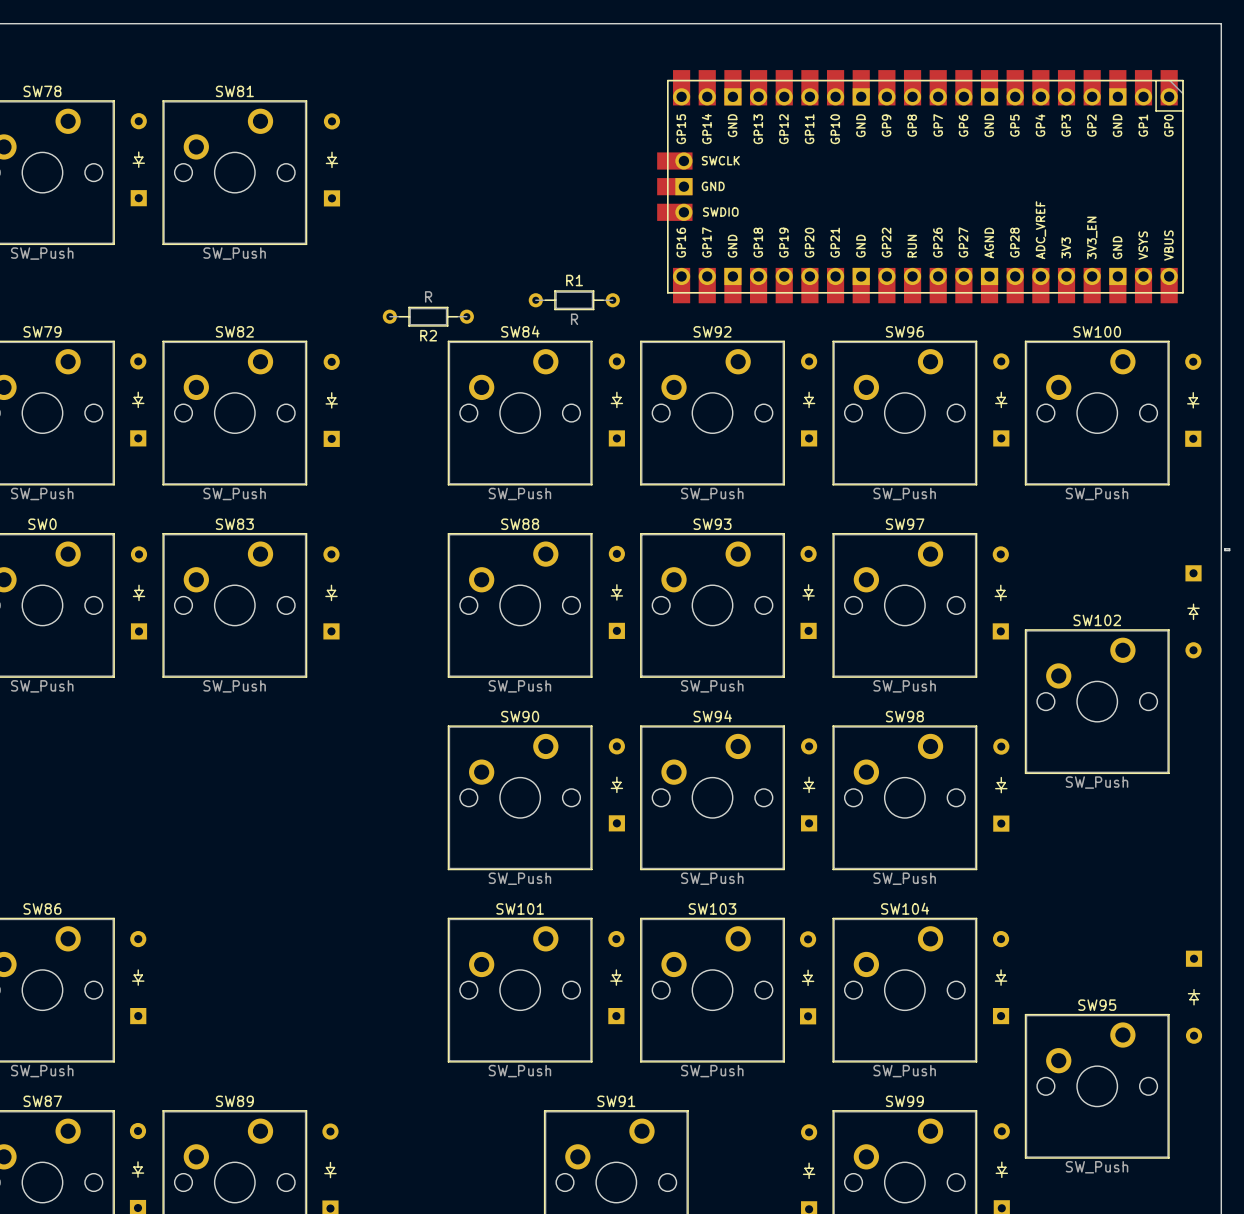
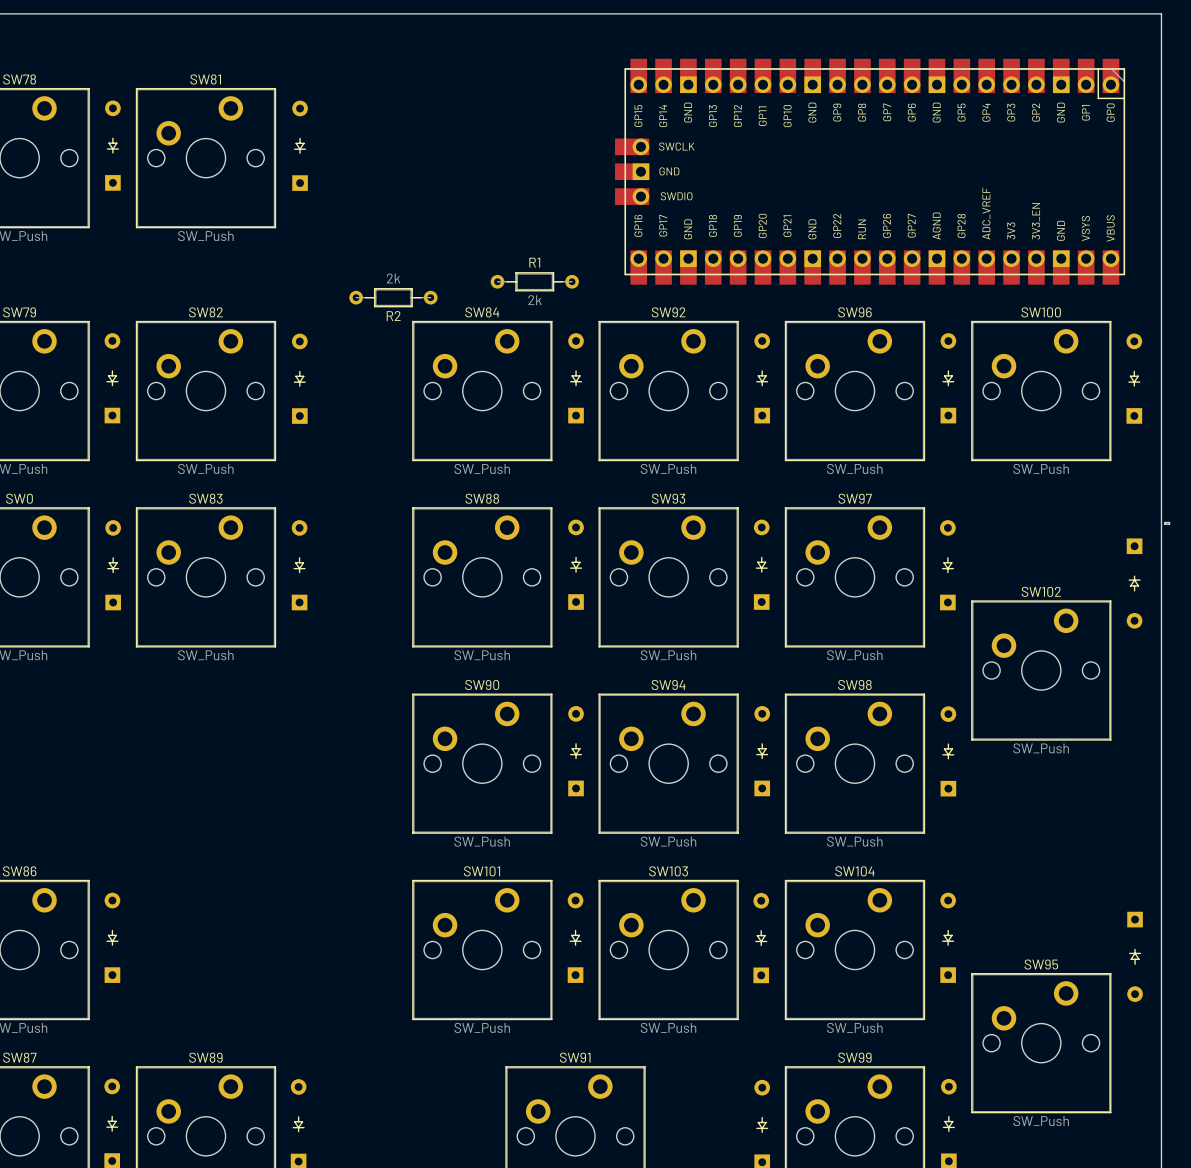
R2 value: R (428, 296) -> 2k (393, 278)
R1 value: R (574, 319) -> 2k (534, 300)

